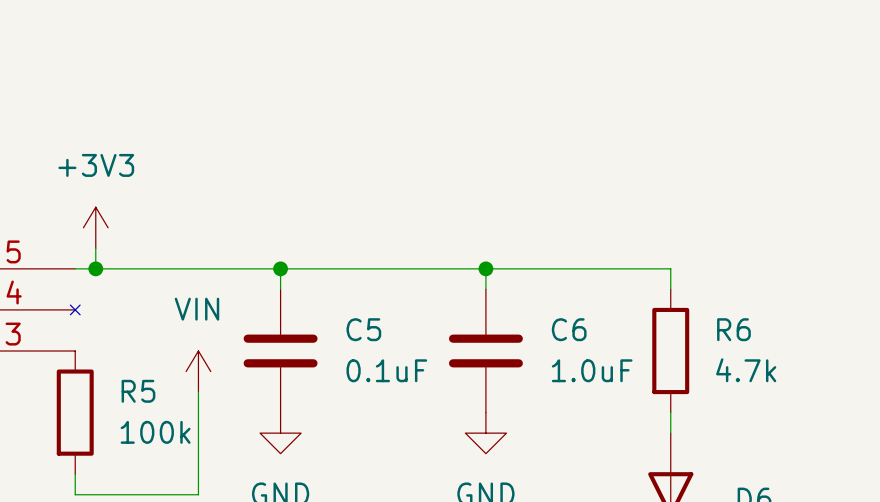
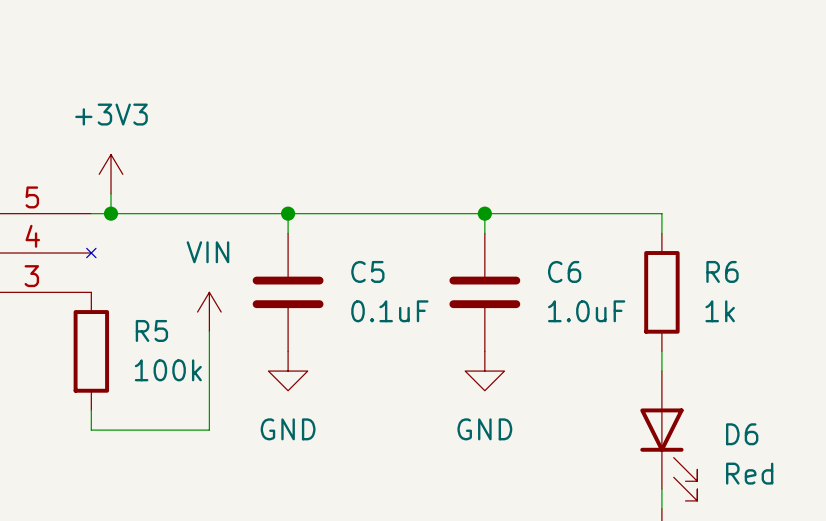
R6 value: 4.7k (746, 370) -> 1k (720, 311)

